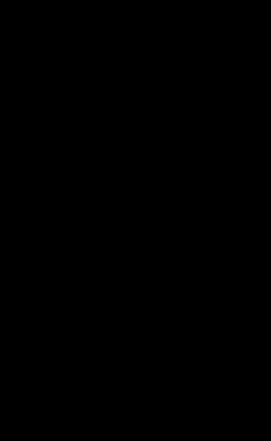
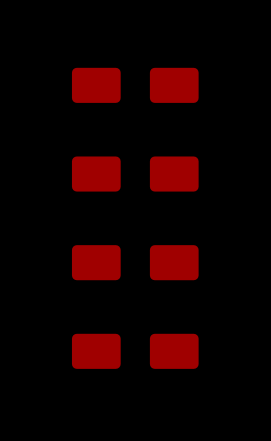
part: none -> (135, 85)
part: none -> (135, 174)
part: none -> (135, 262)
part: none -> (135, 351)

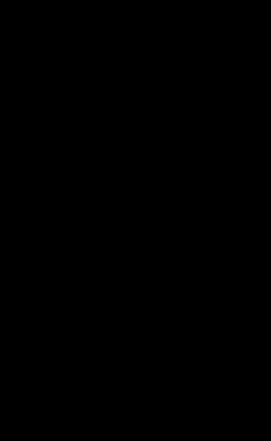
part: (135, 85) -> none
part: (135, 174) -> none
part: (135, 262) -> none
part: (135, 351) -> none

